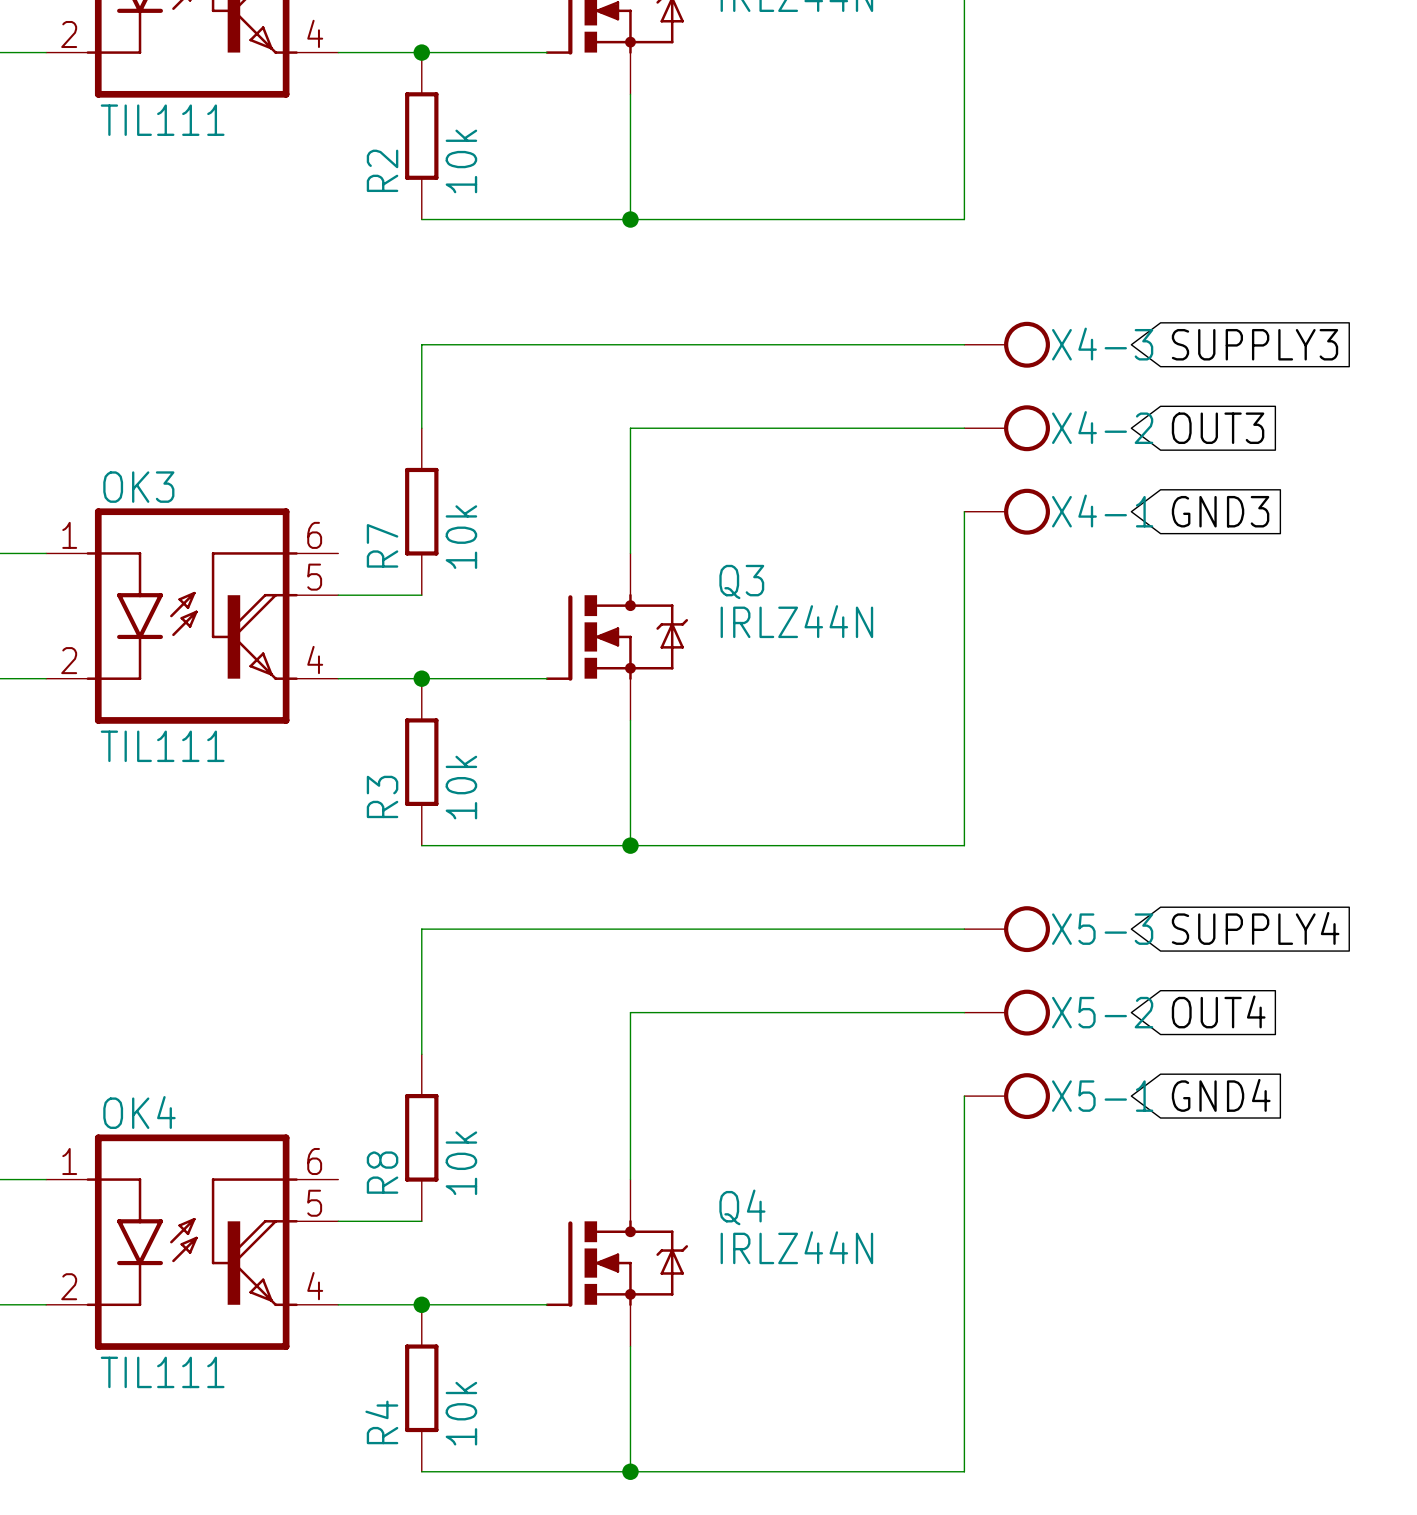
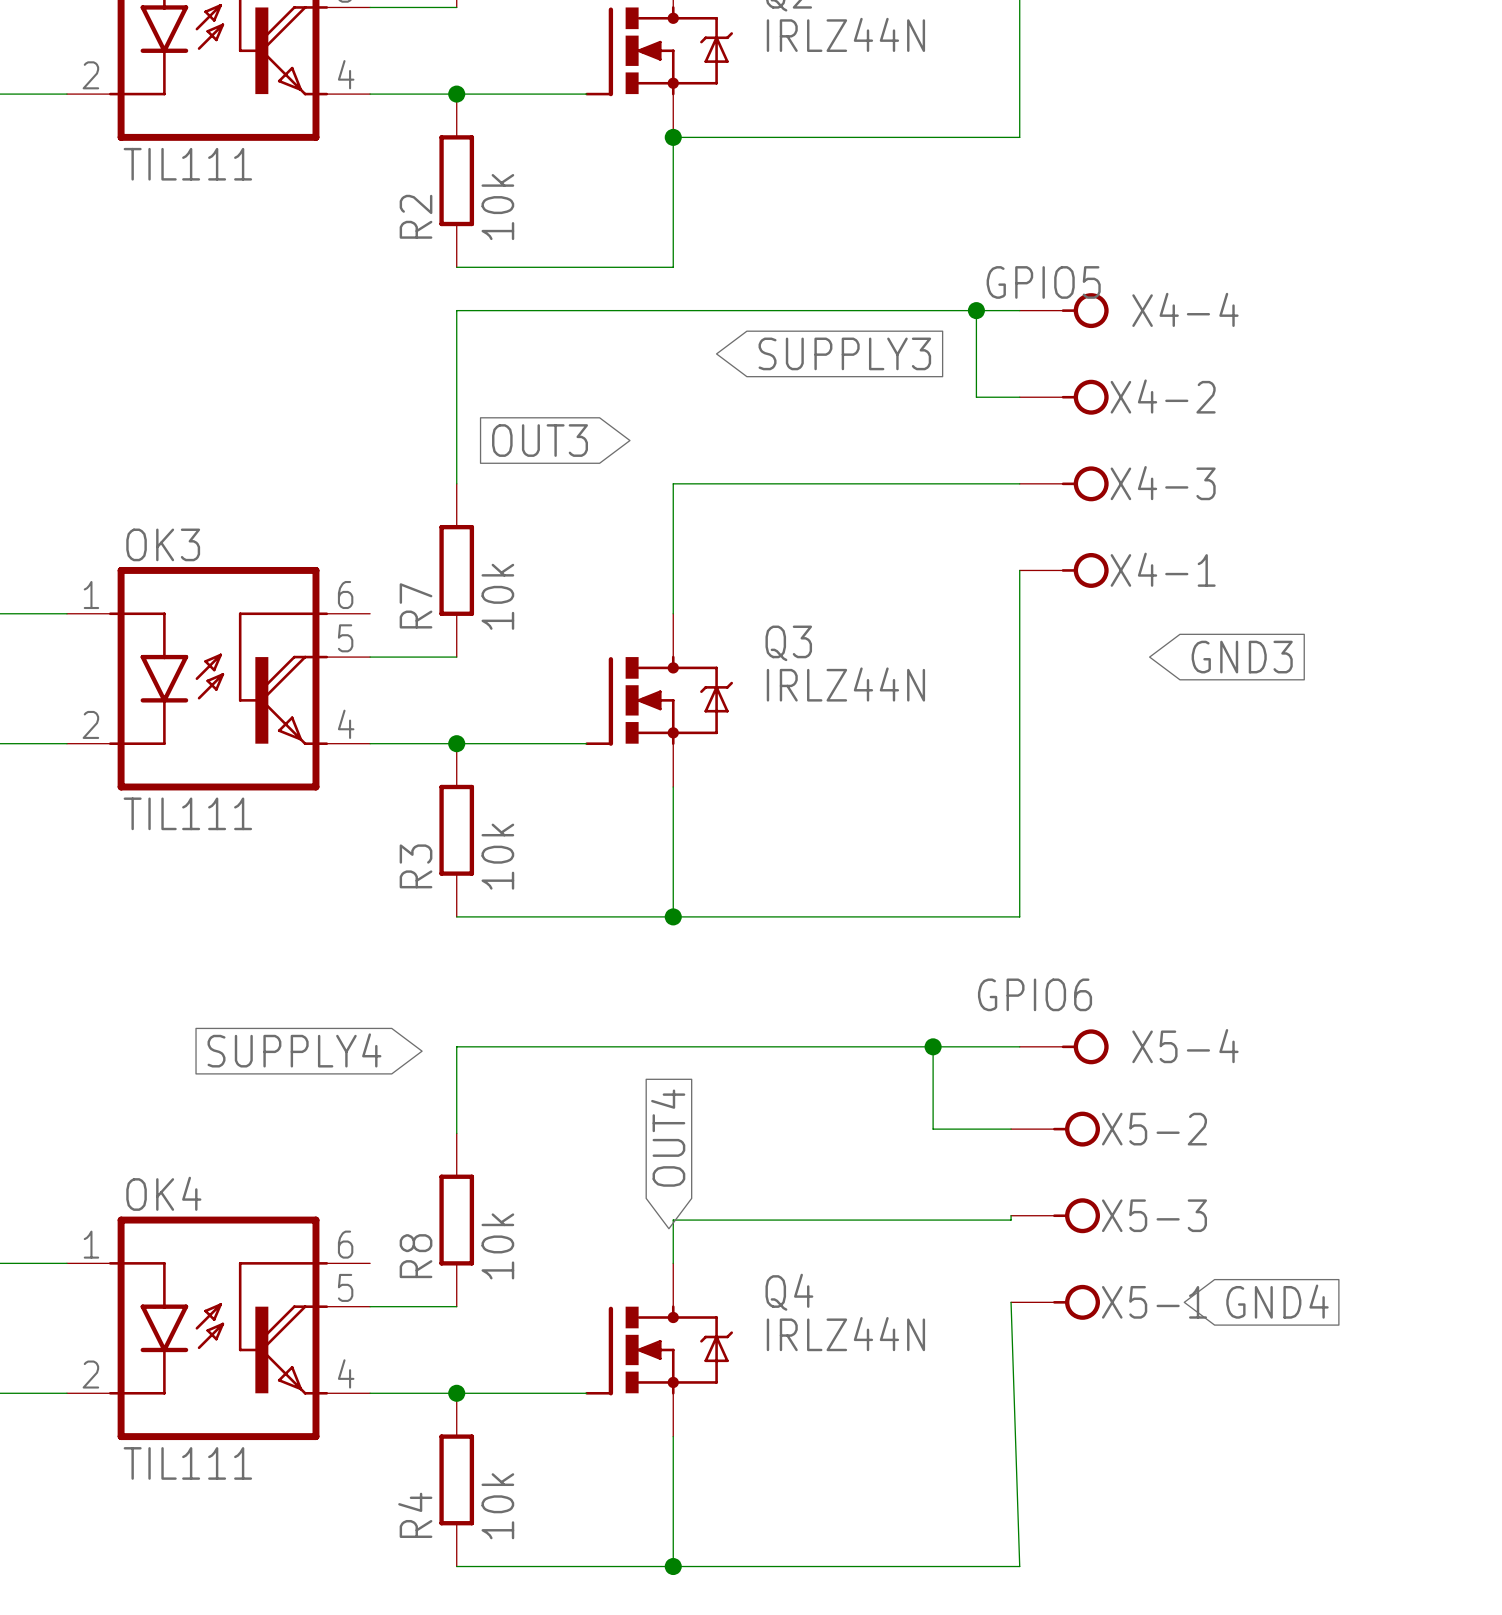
junction: none -> (673, 137)
wire: (964, 94) (964, 219) (630, 219) -> (1019, 137) (673, 137)
junction: (630, 219) -> none
wire: none -> (976, 310) (976, 397)
junction: none -> (976, 310)
X4-4: none -> GPIO5 (1064, 310)
global label: none -> SUPPLY3 (844, 353)
X4-3 symbol: [964, 321, 1050, 368] -> [1019, 466, 1109, 502]
wire: (421, 344) (922, 344) -> (456, 397) (456, 310) (1019, 310)
global label: SUPPLY3 (1254, 344) -> none
global label: none -> OUT3 (540, 440)
X4-2 symbol: [964, 405, 1050, 452] -> [1019, 379, 1109, 415]
global label: OUT3 (1218, 428) -> none
X4-1 symbol: [964, 488, 1050, 535] -> [1019, 552, 1109, 588]
global label position: GND3 (1220, 511) -> GND3 (1242, 657)
X5-3 symbol: [964, 906, 1050, 953] -> [1011, 1198, 1100, 1234]
X5-3 value: none -> GPIO6 (1035, 994)
global label: SUPPLY4 (1255, 928) -> none
wire: (964, 929) (421, 929) (421, 970) -> (1019, 1046) (456, 1046)
wire: none -> (933, 1046) (933, 1129) (1011, 1129)
junction: none -> (933, 1046)
X5-4: none -> (1064, 1046)
global label: none -> SUPPLY4 (294, 1050)
X5-2 symbol: [964, 989, 1050, 1036] -> [1011, 1111, 1100, 1147]
global label: OUT4 (1218, 1011) -> none
wire: (964, 1012) (630, 1012) (630, 1137) -> (1011, 1215) (1011, 1220) (673, 1220)
global label: none -> OUT4 (668, 1138)
X5-1 symbol: [964, 1073, 1050, 1120] -> [1011, 1284, 1100, 1320]
global label position: GND4 (1221, 1095) -> GND4 (1277, 1301)
wire: (964, 1096) (964, 1471) -> (1011, 1302) (1019, 1566)

